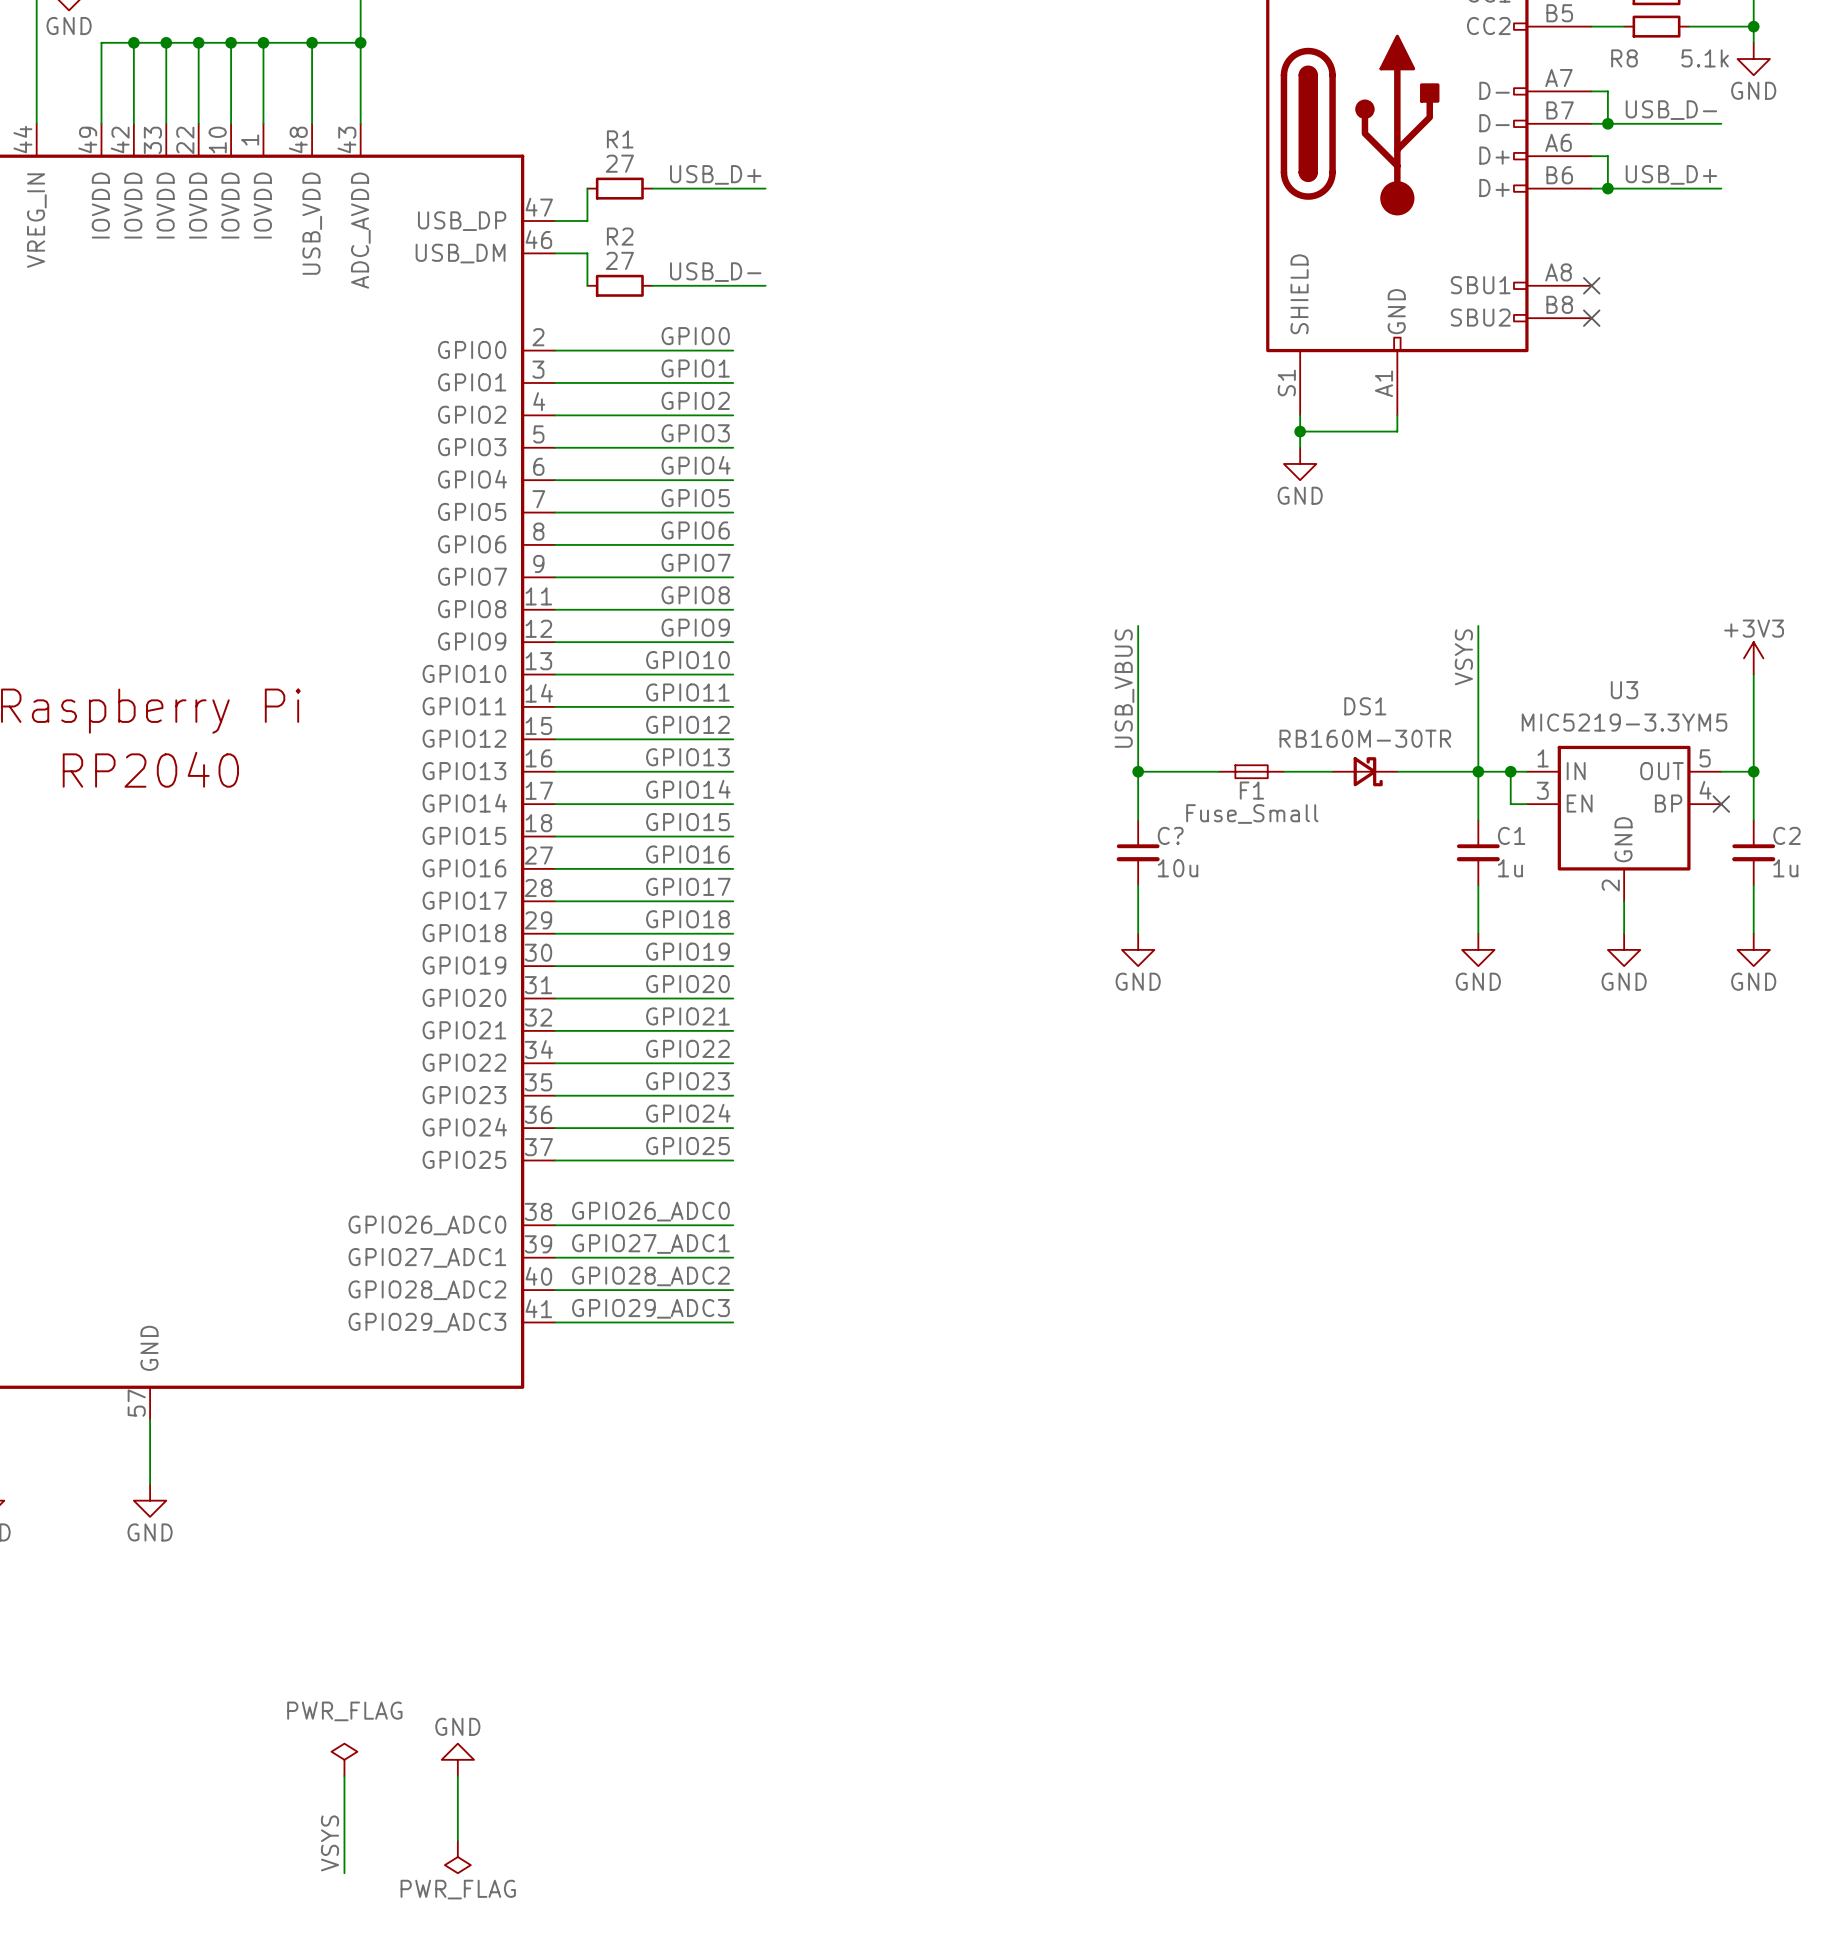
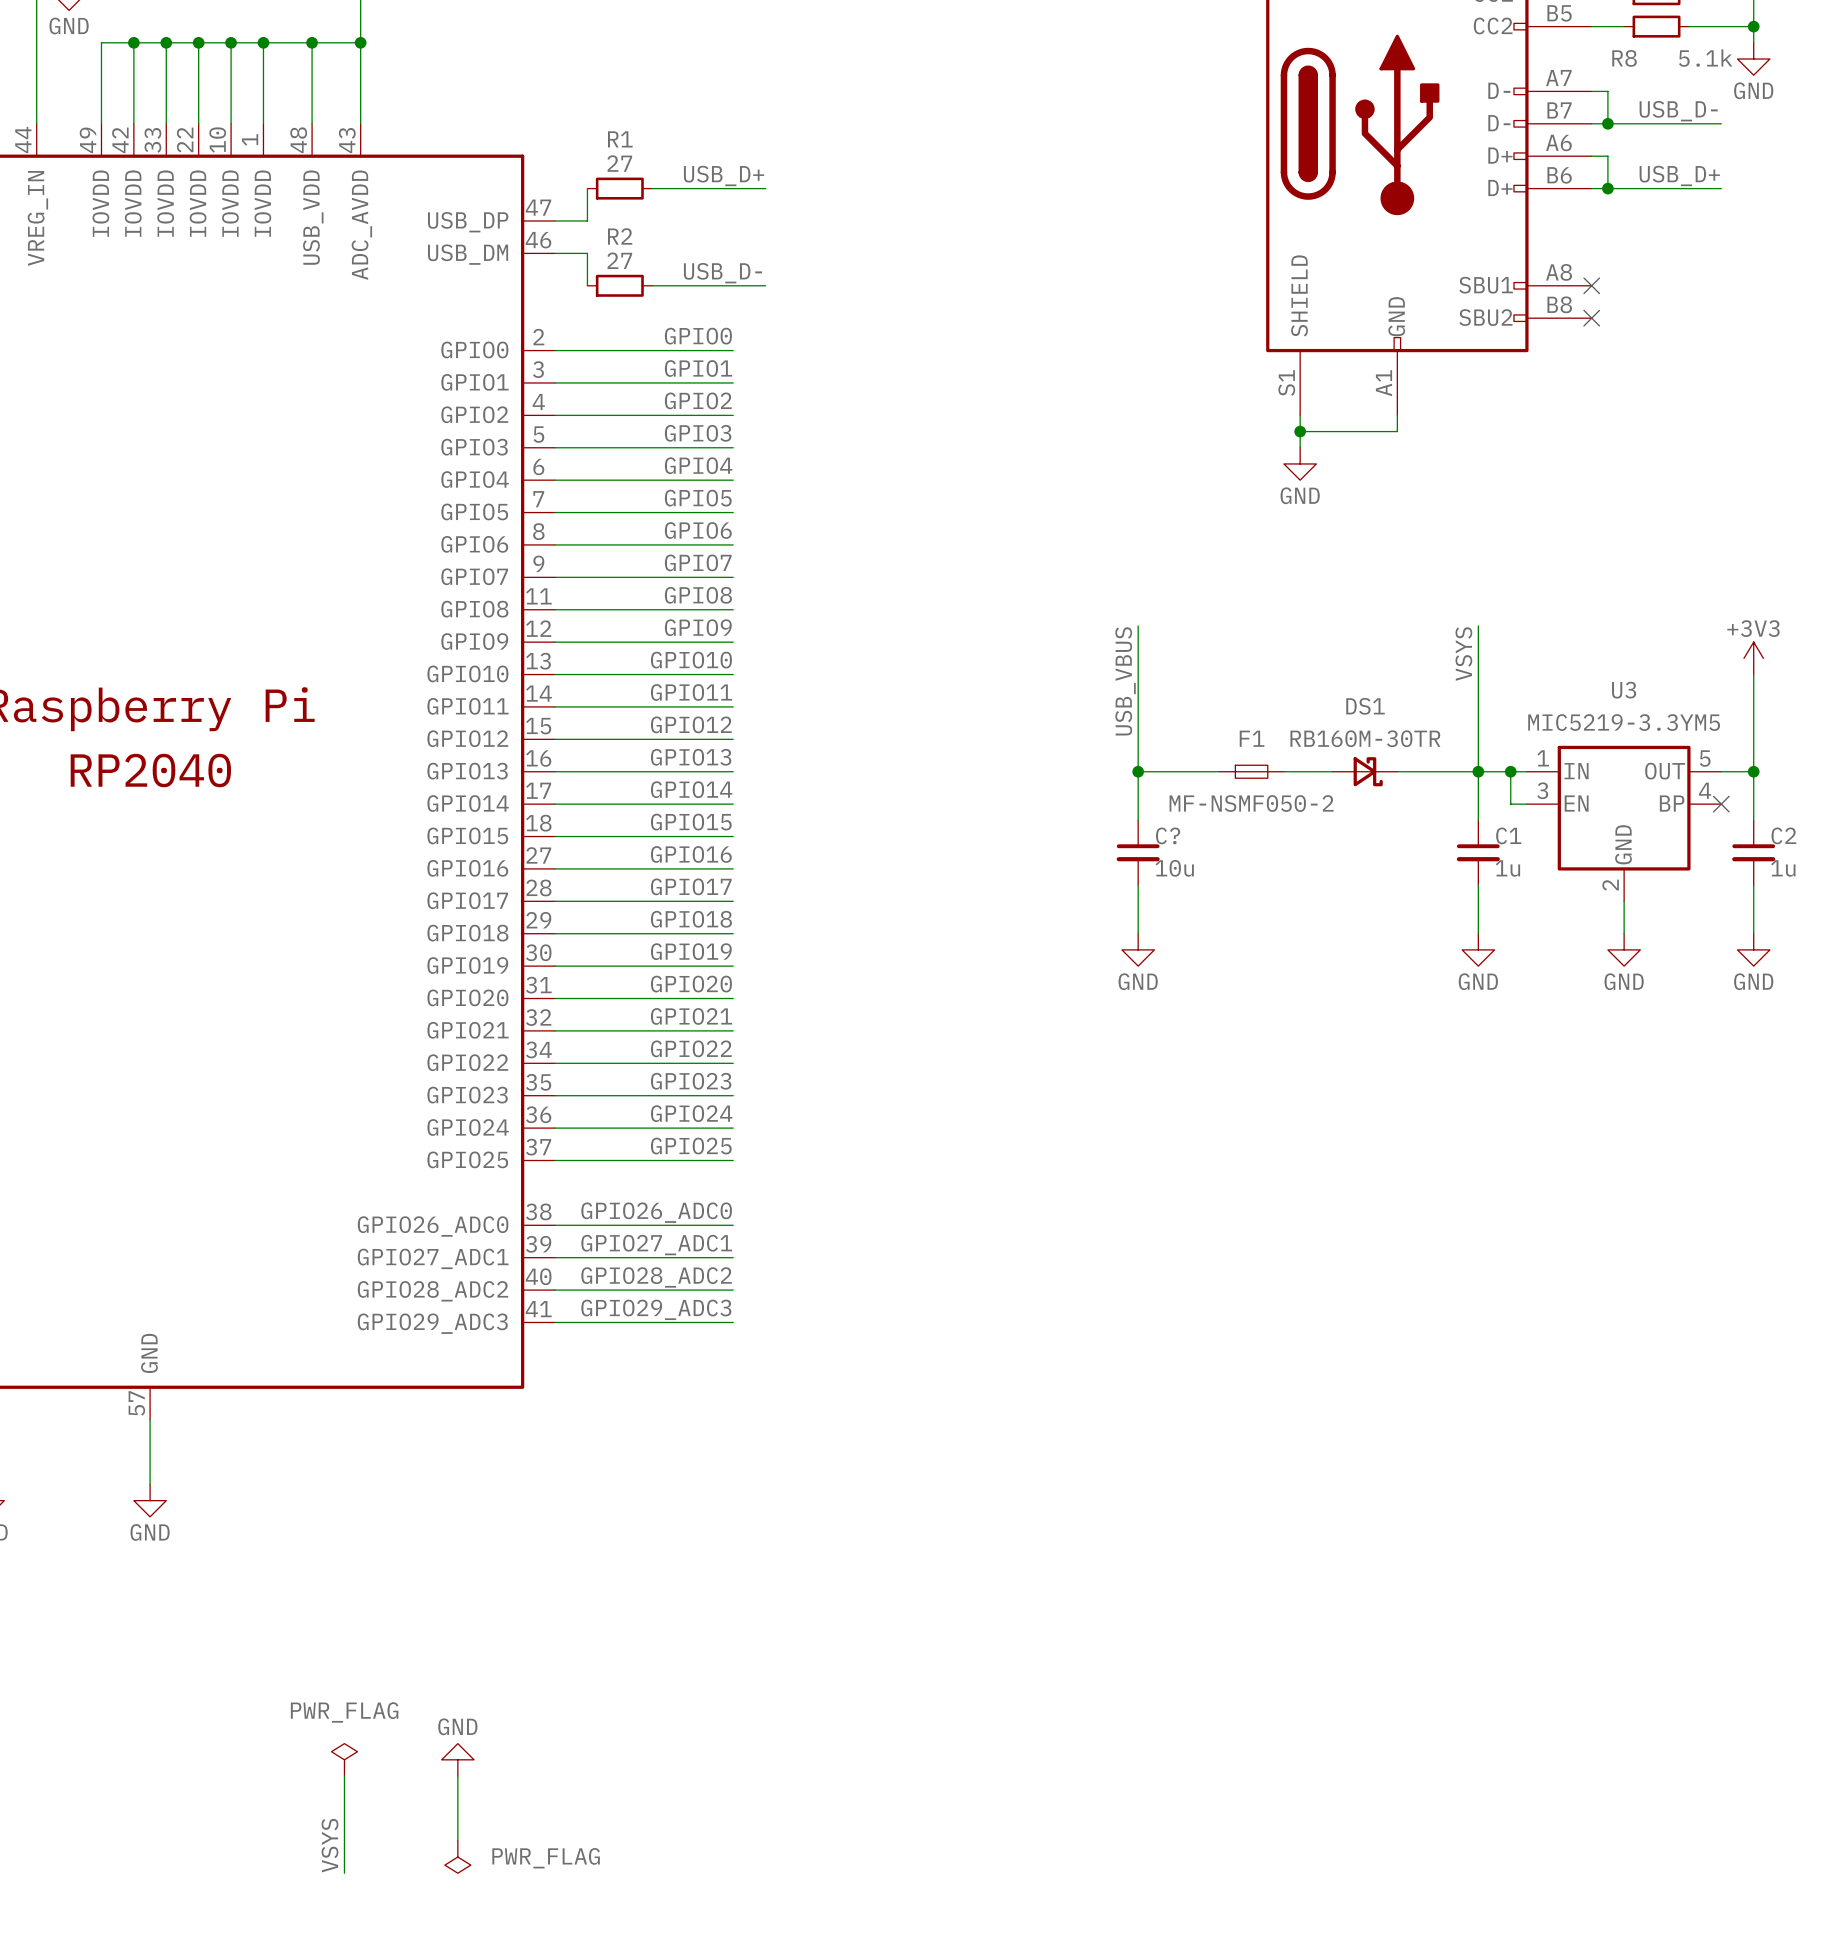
F1 name position: F1 (1251, 790) -> F1 (1252, 738)
F1 value: Fuse_Small (1252, 814) -> MF-NSMF050-2 (1251, 803)
power symbol text position: PWR_FLAG (458, 1889) -> PWR_FLAG (546, 1858)

